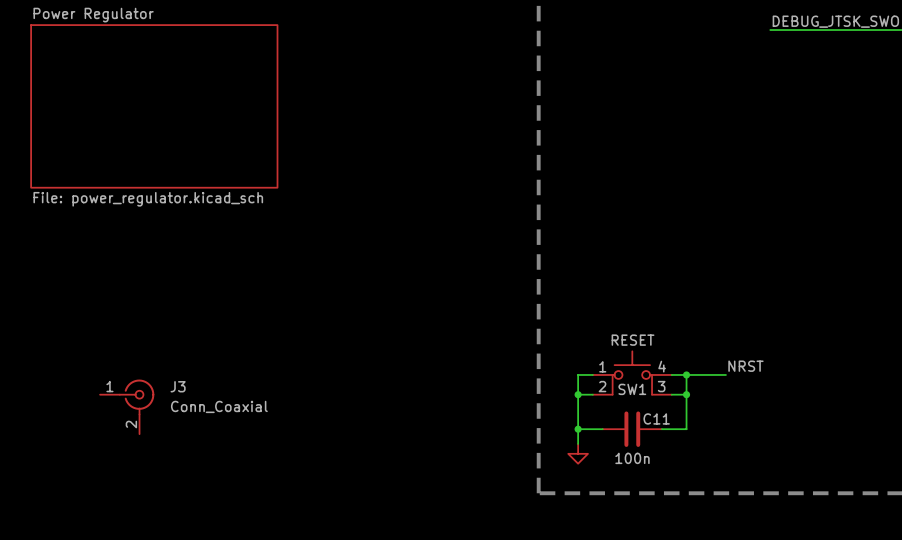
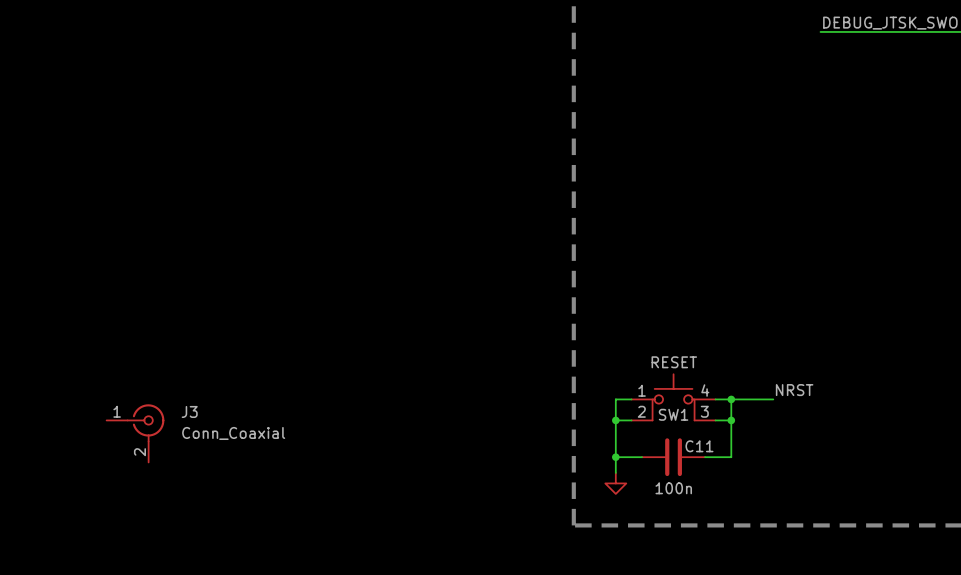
sheet Power Regulator: File: power_regulator.kicad_sch (154, 106) -> none

